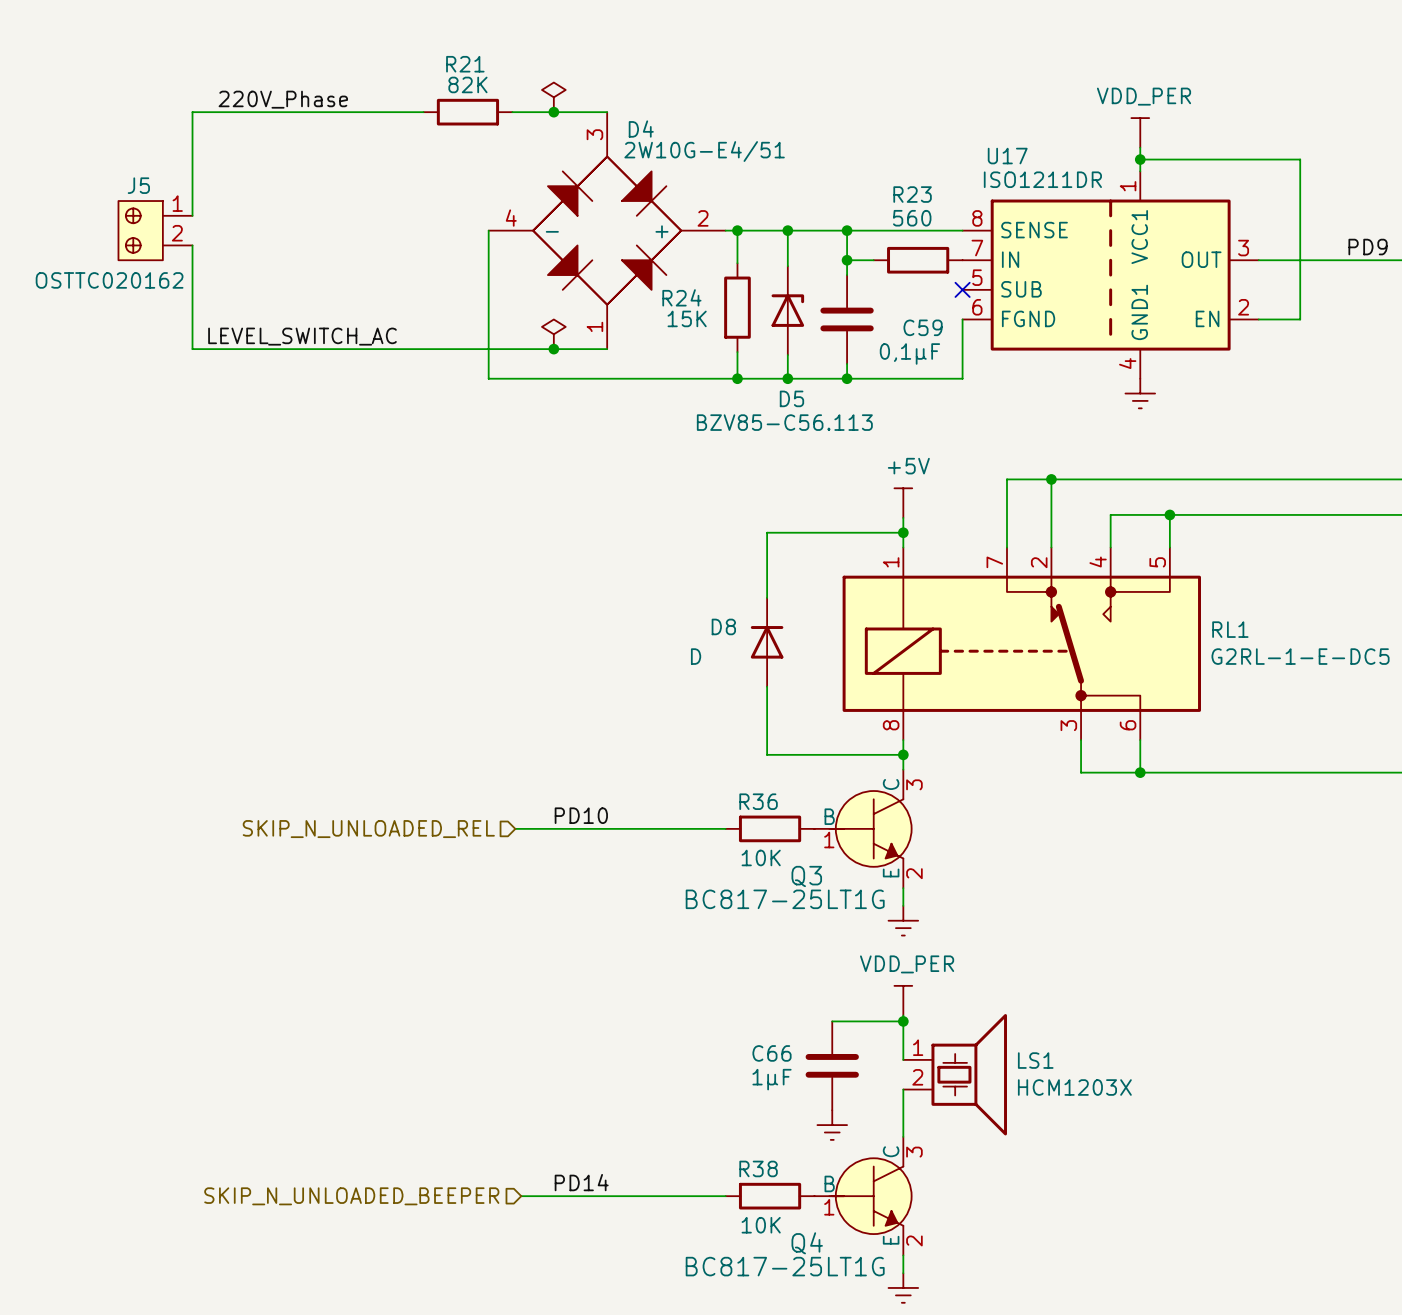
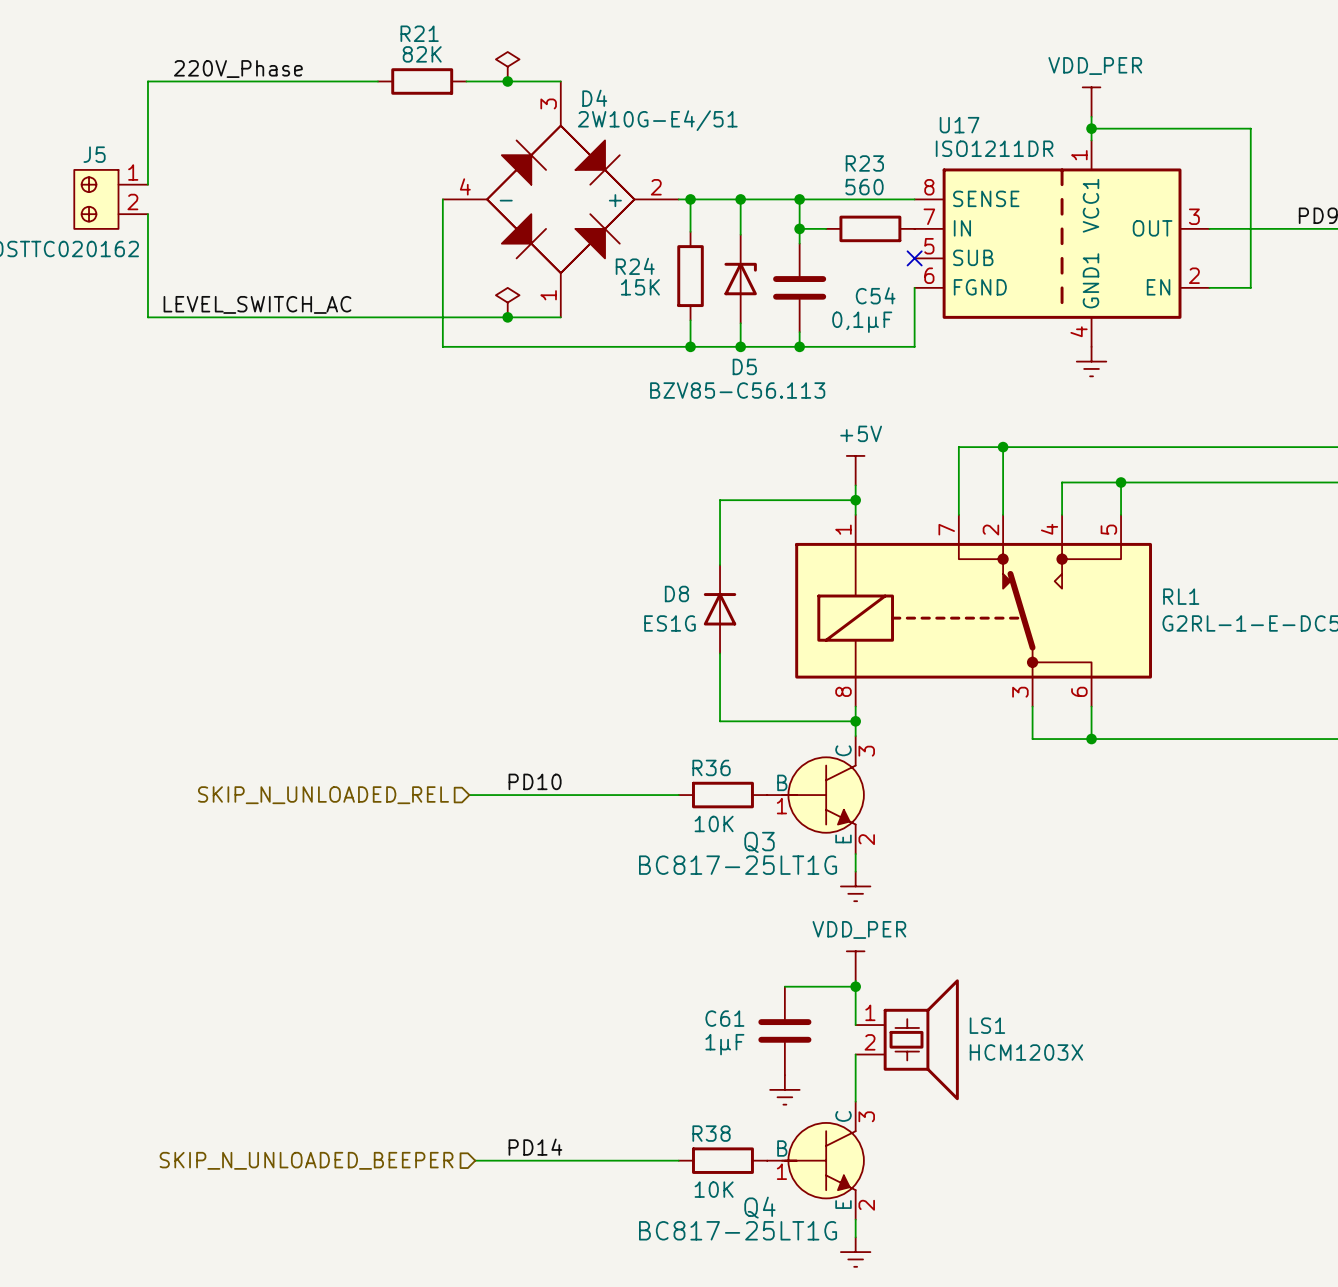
C59 name: C59 (923, 327) -> C54 (875, 295)
D8 value: D (696, 656) -> ES1G (670, 623)
C66 name: C66 (772, 1053) -> C61 (724, 1018)

